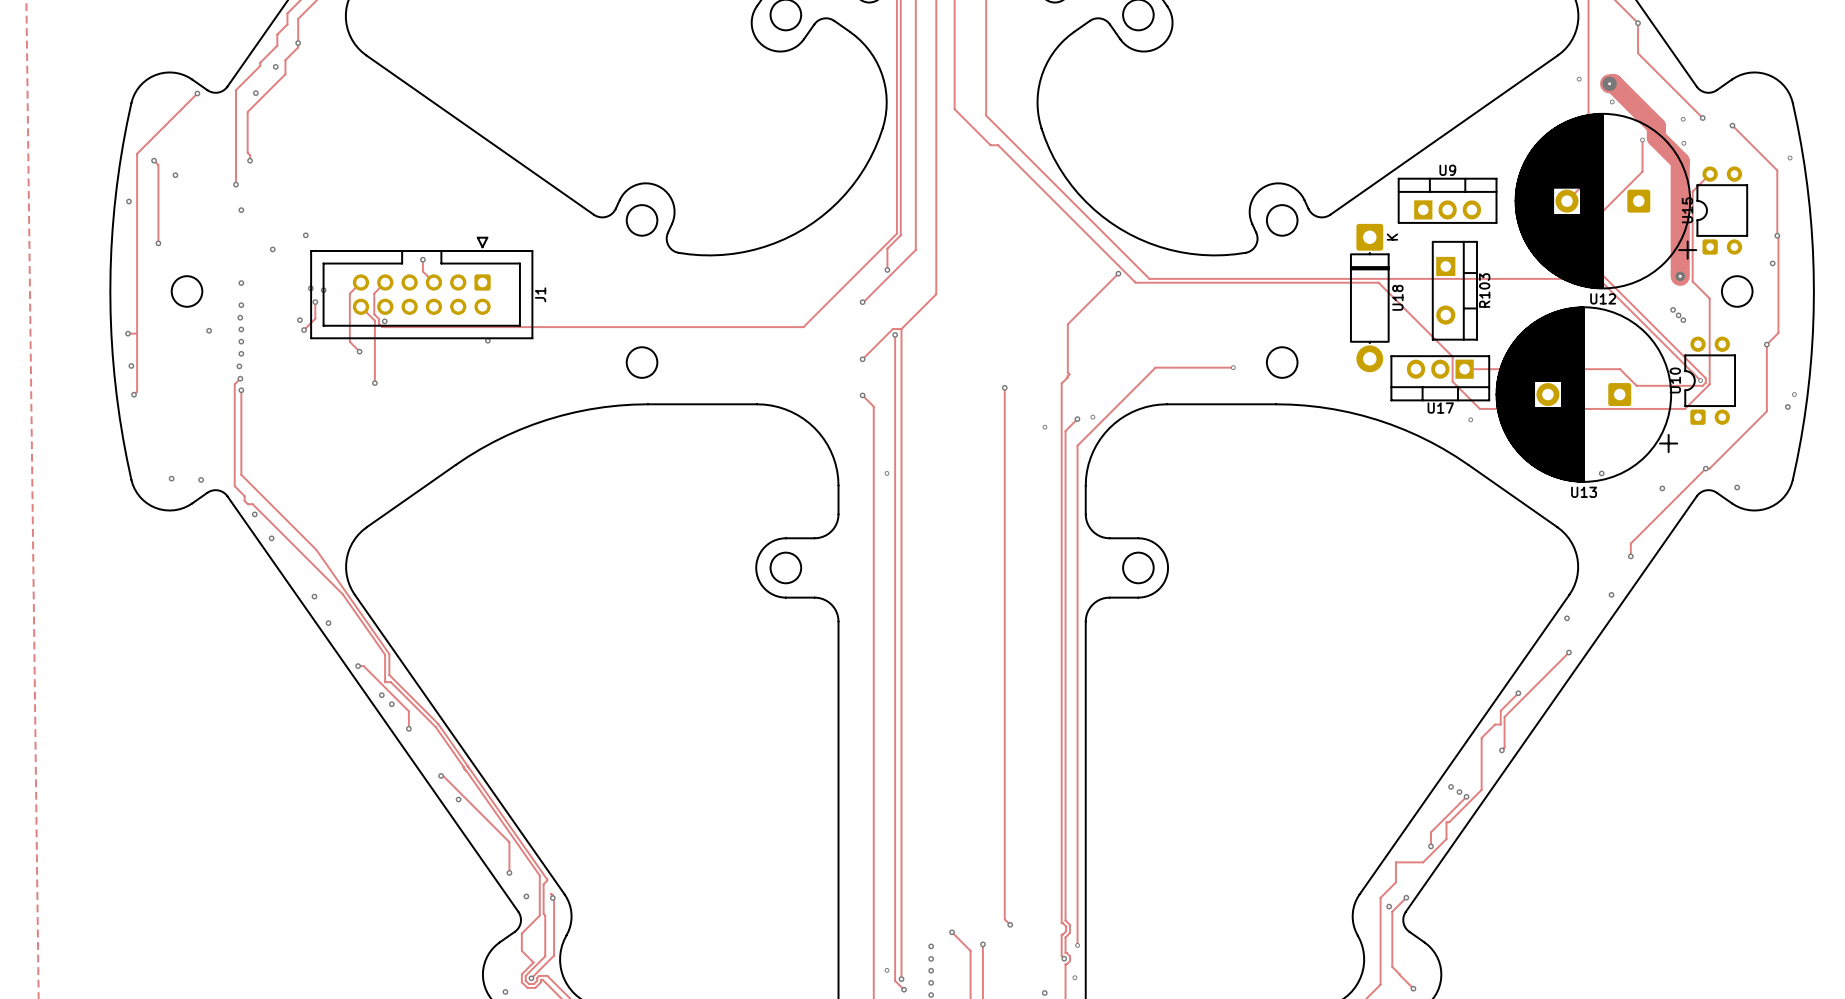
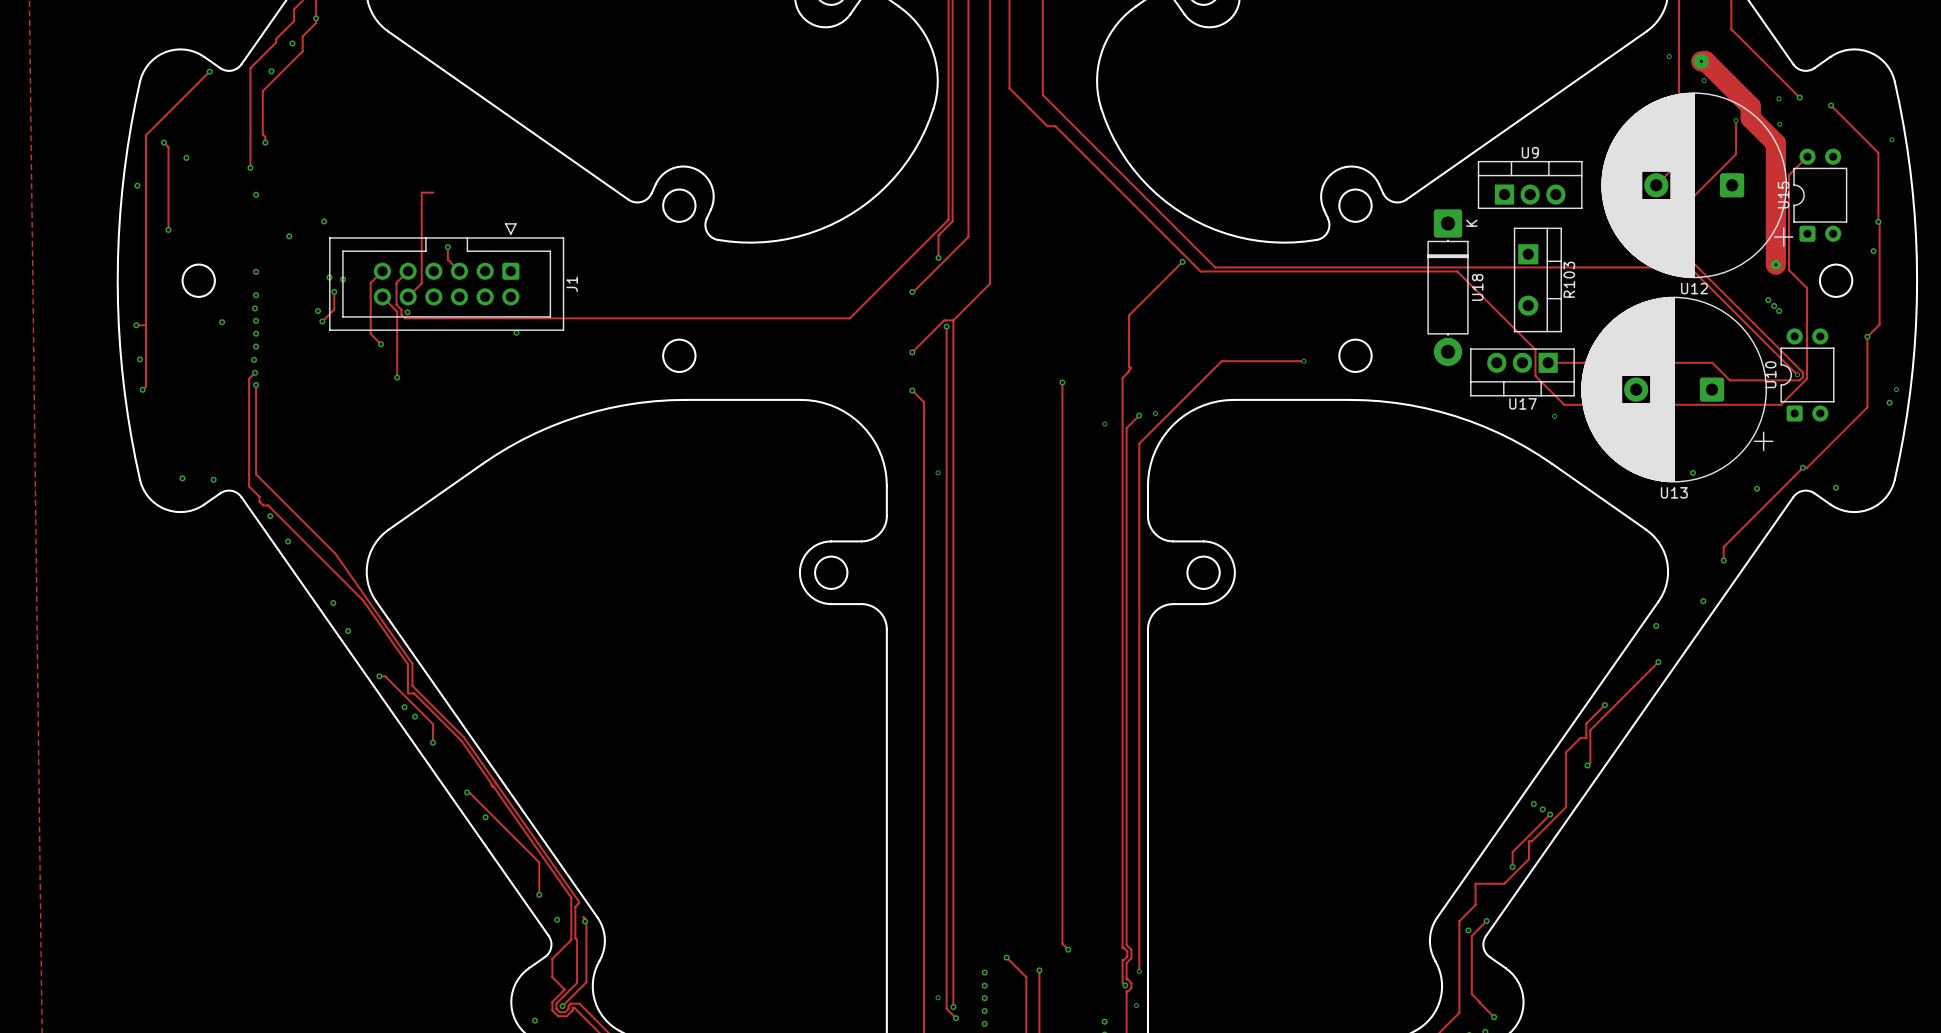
track: none -> (433, 192) (421, 192) (421, 283) (408, 296)

